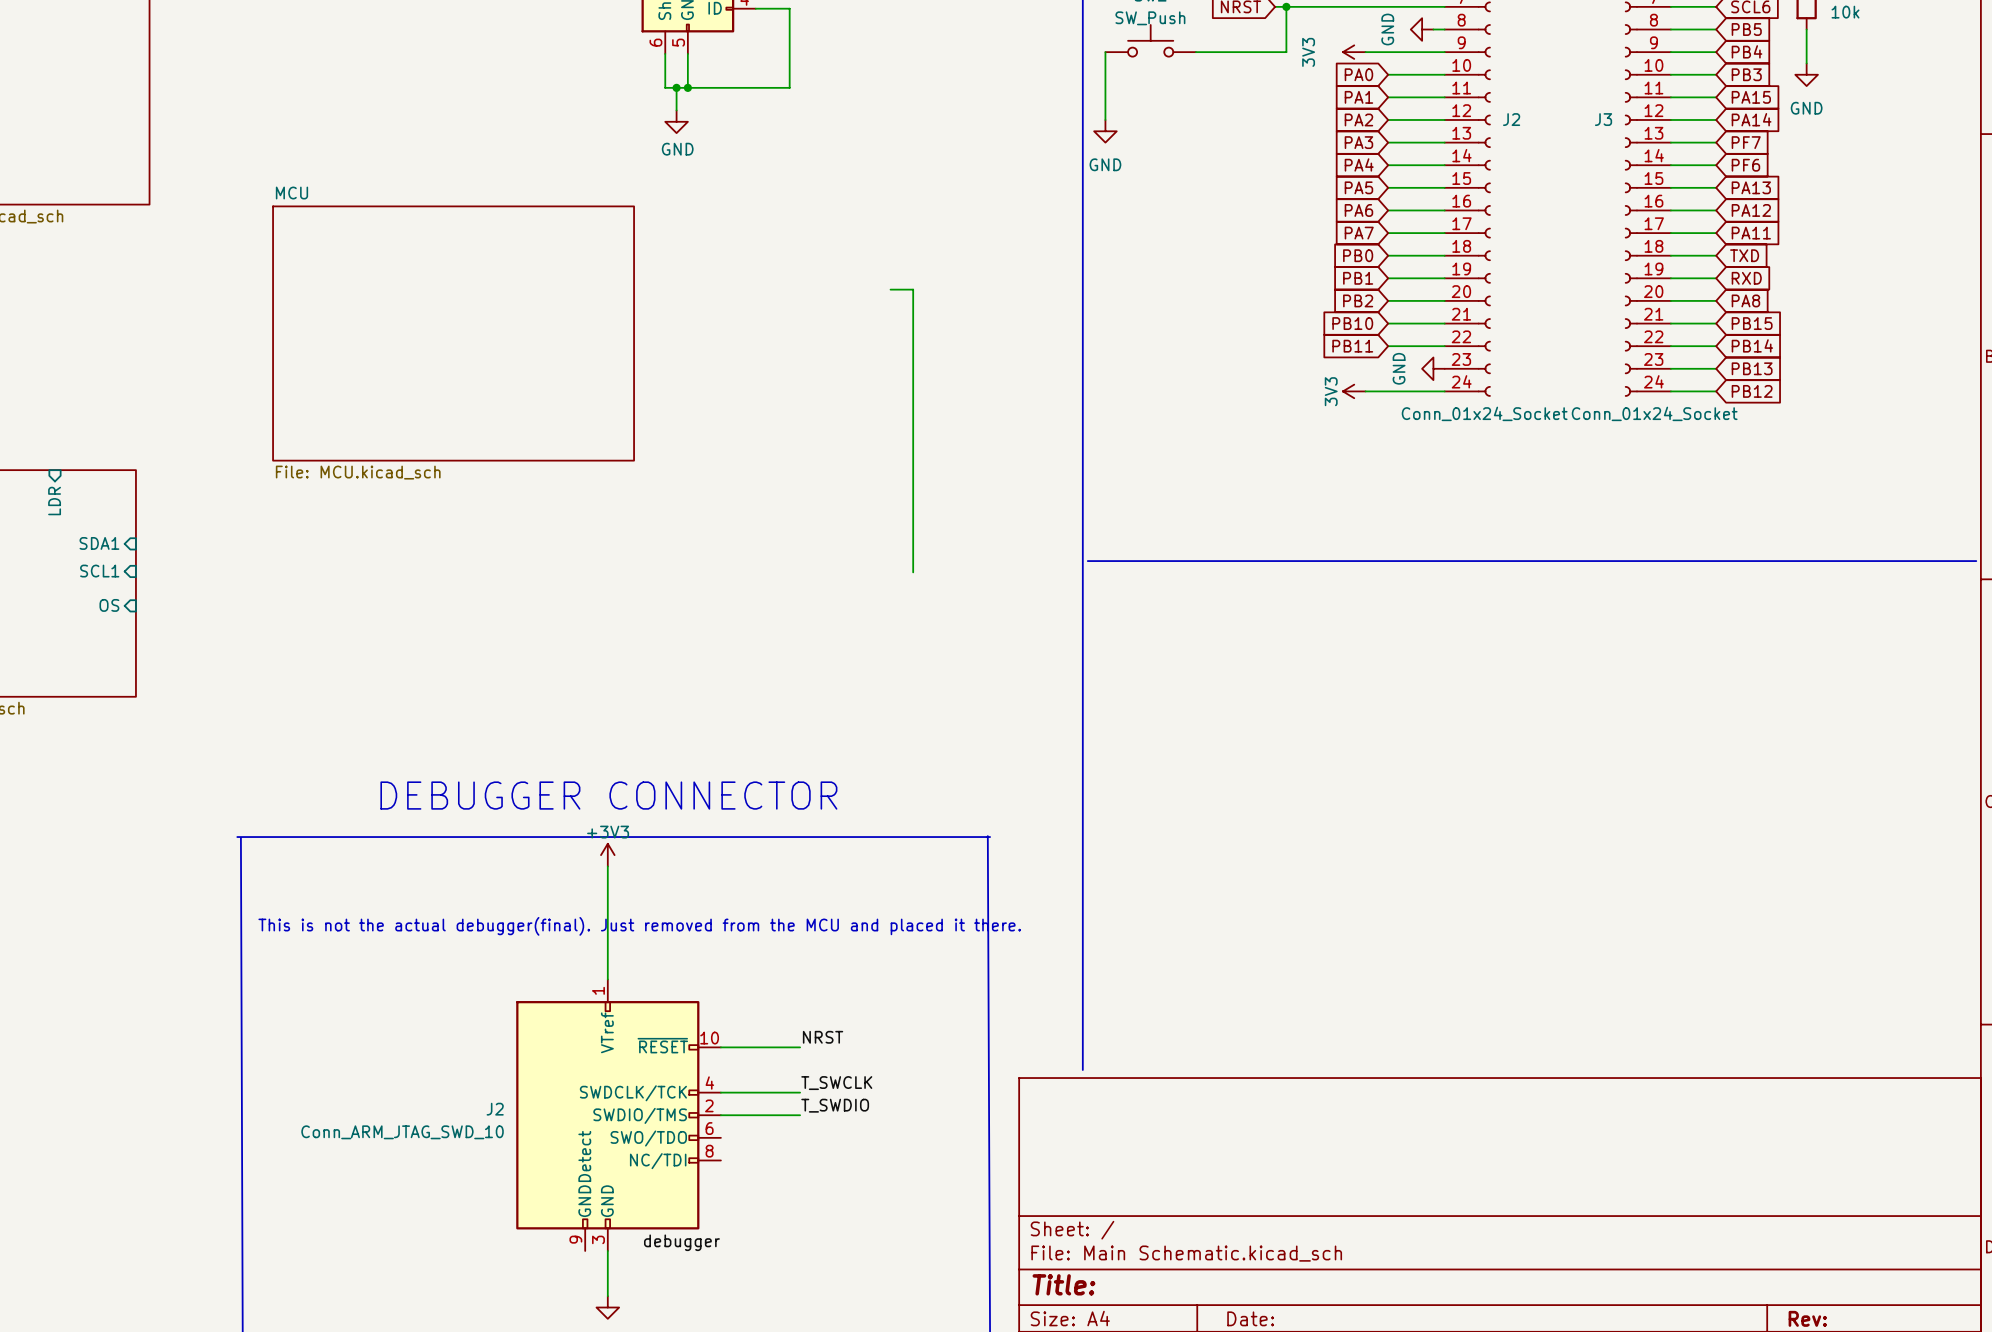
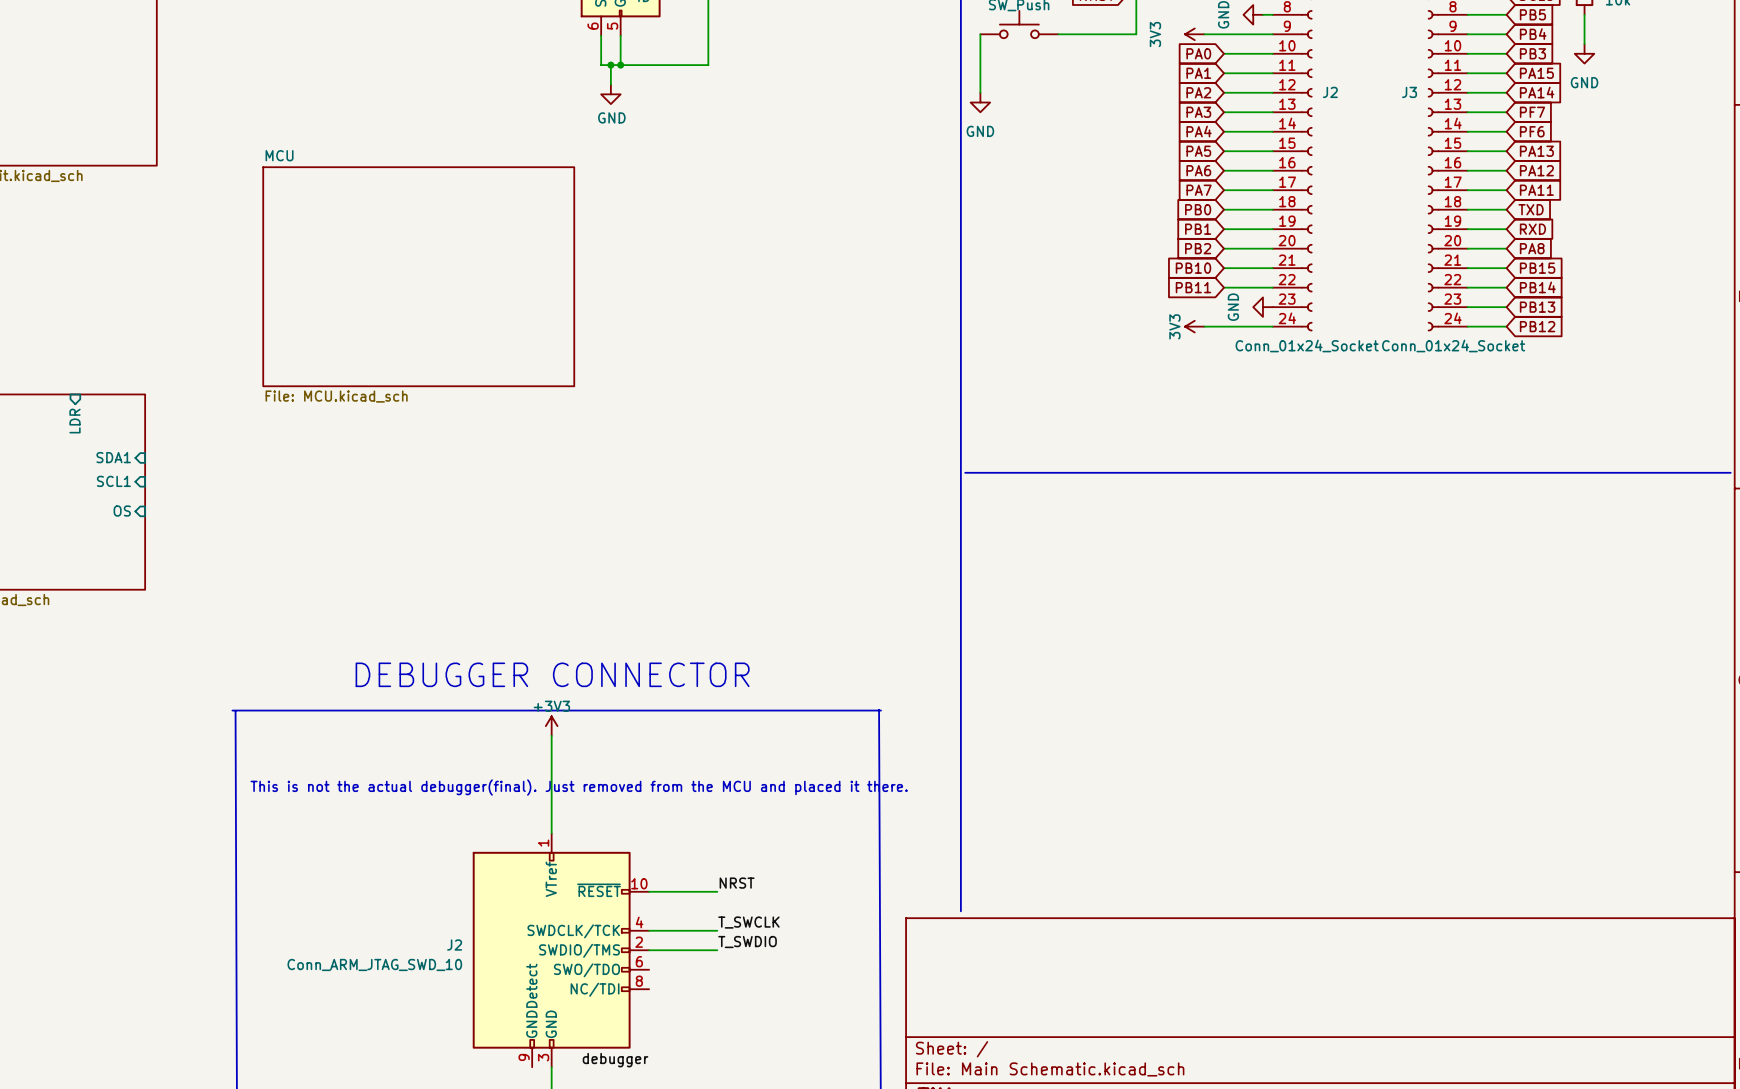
wire: (890, 289) (913, 289) (913, 572) -> none

